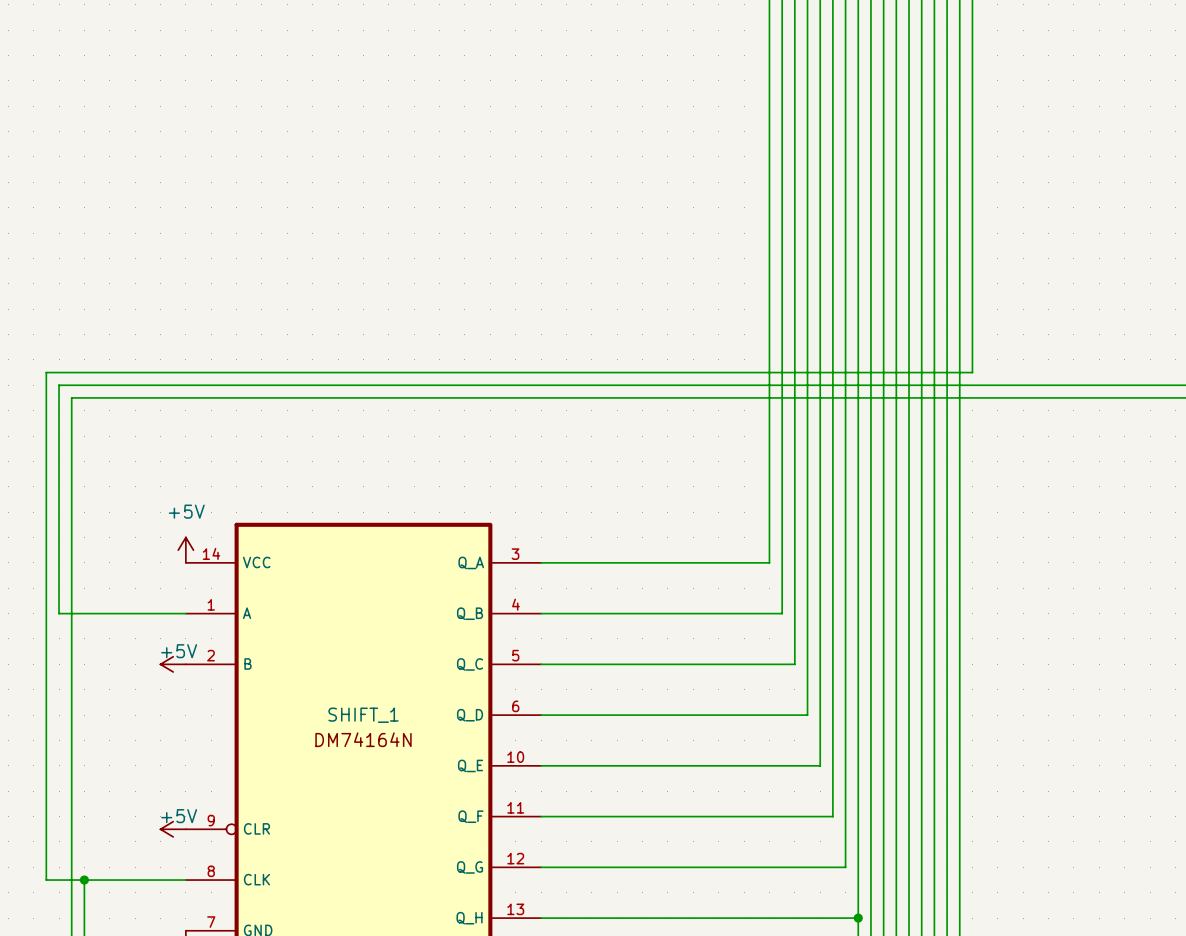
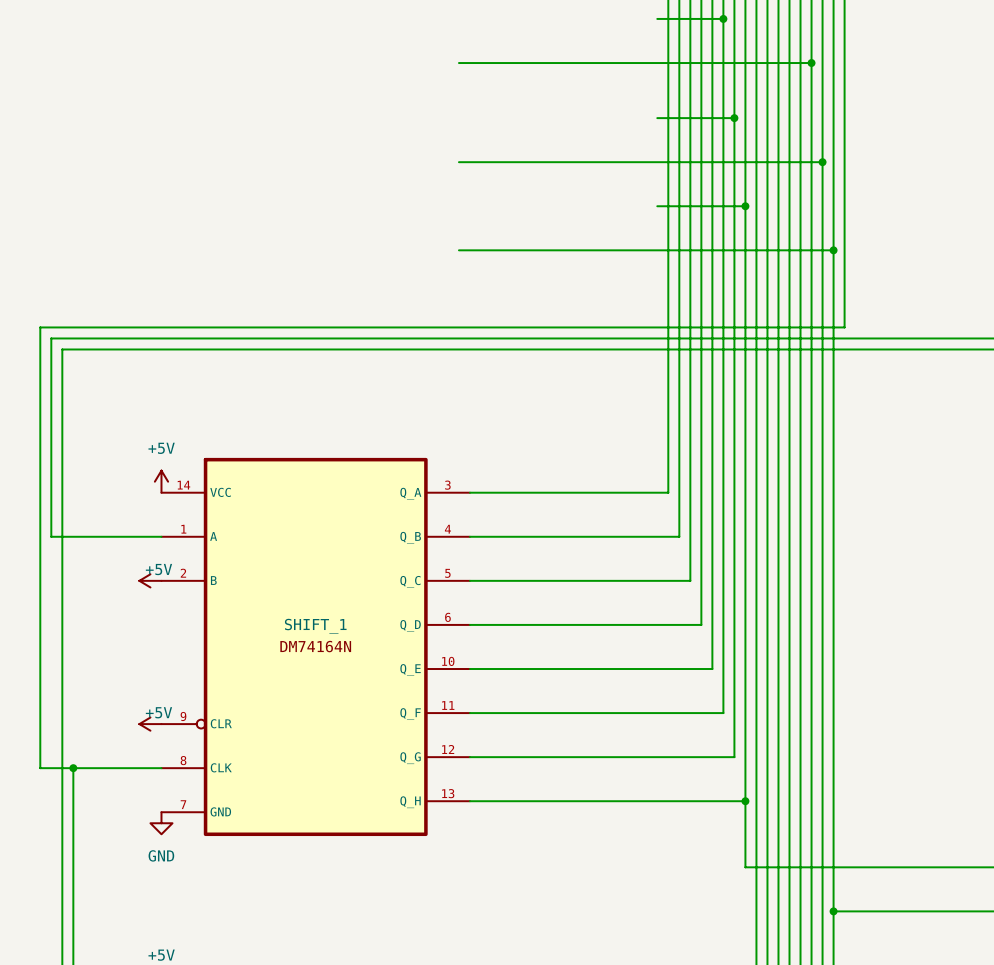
wire: none -> (657, 18) (723, 18)
junction: none -> (723, 18)
wire: none -> (458, 63) (811, 63)
junction: none -> (811, 63)
wire: none -> (657, 118) (734, 118)
junction: none -> (734, 118)
wire: none -> (458, 162) (822, 162)
junction: none -> (822, 162)
wire: none -> (657, 206) (745, 206)
junction: none -> (745, 206)
wire: none -> (458, 250) (833, 250)
junction: none -> (833, 250)

